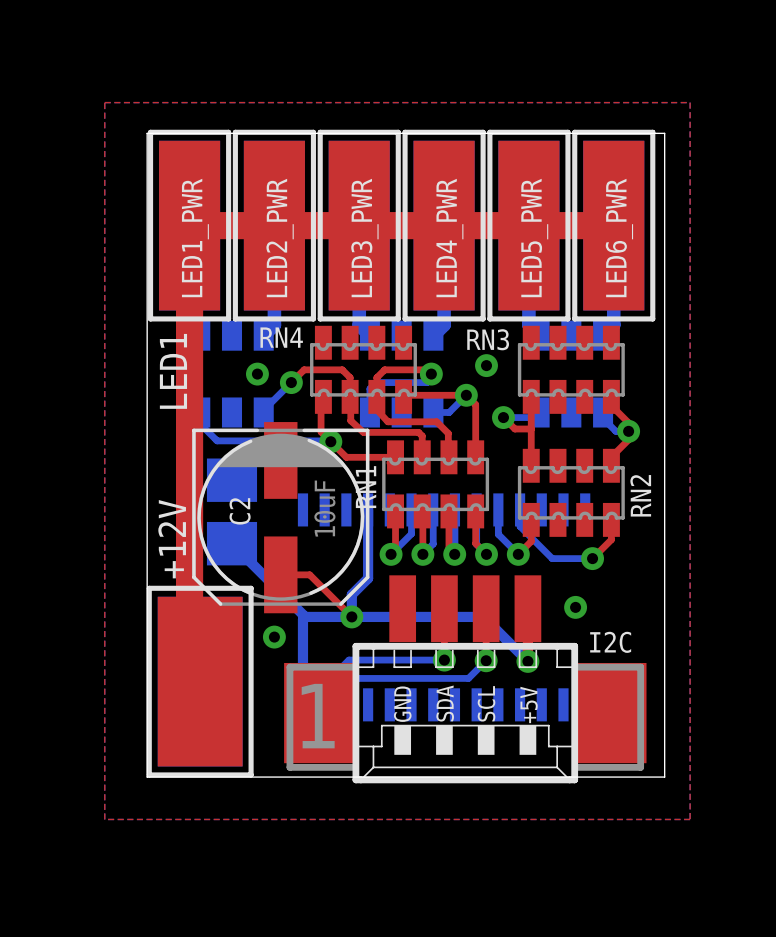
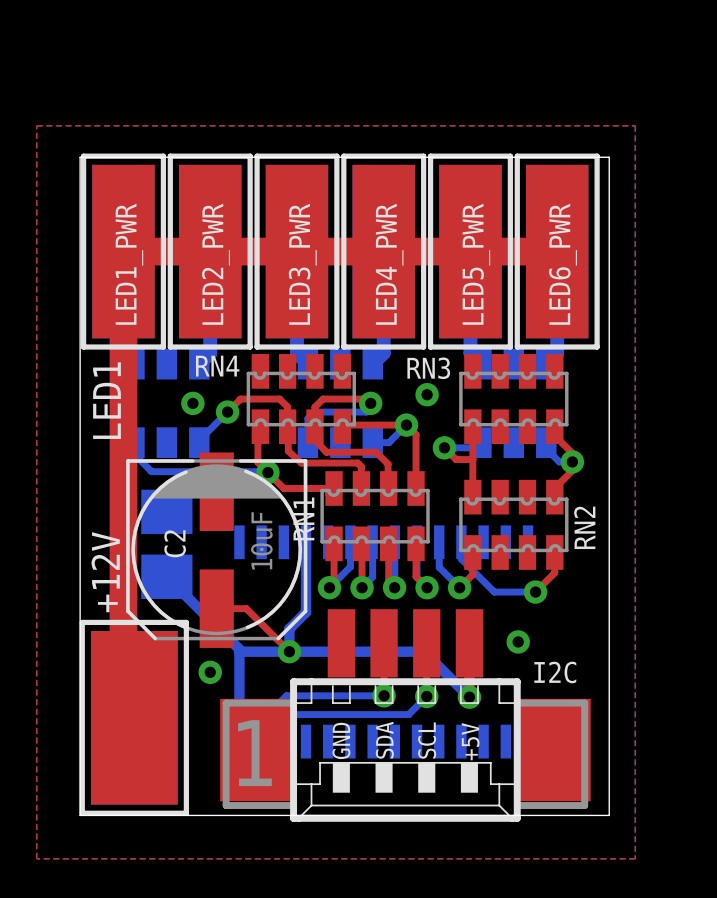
I2C name position: I2C (610, 642) -> I2C (555, 672)

